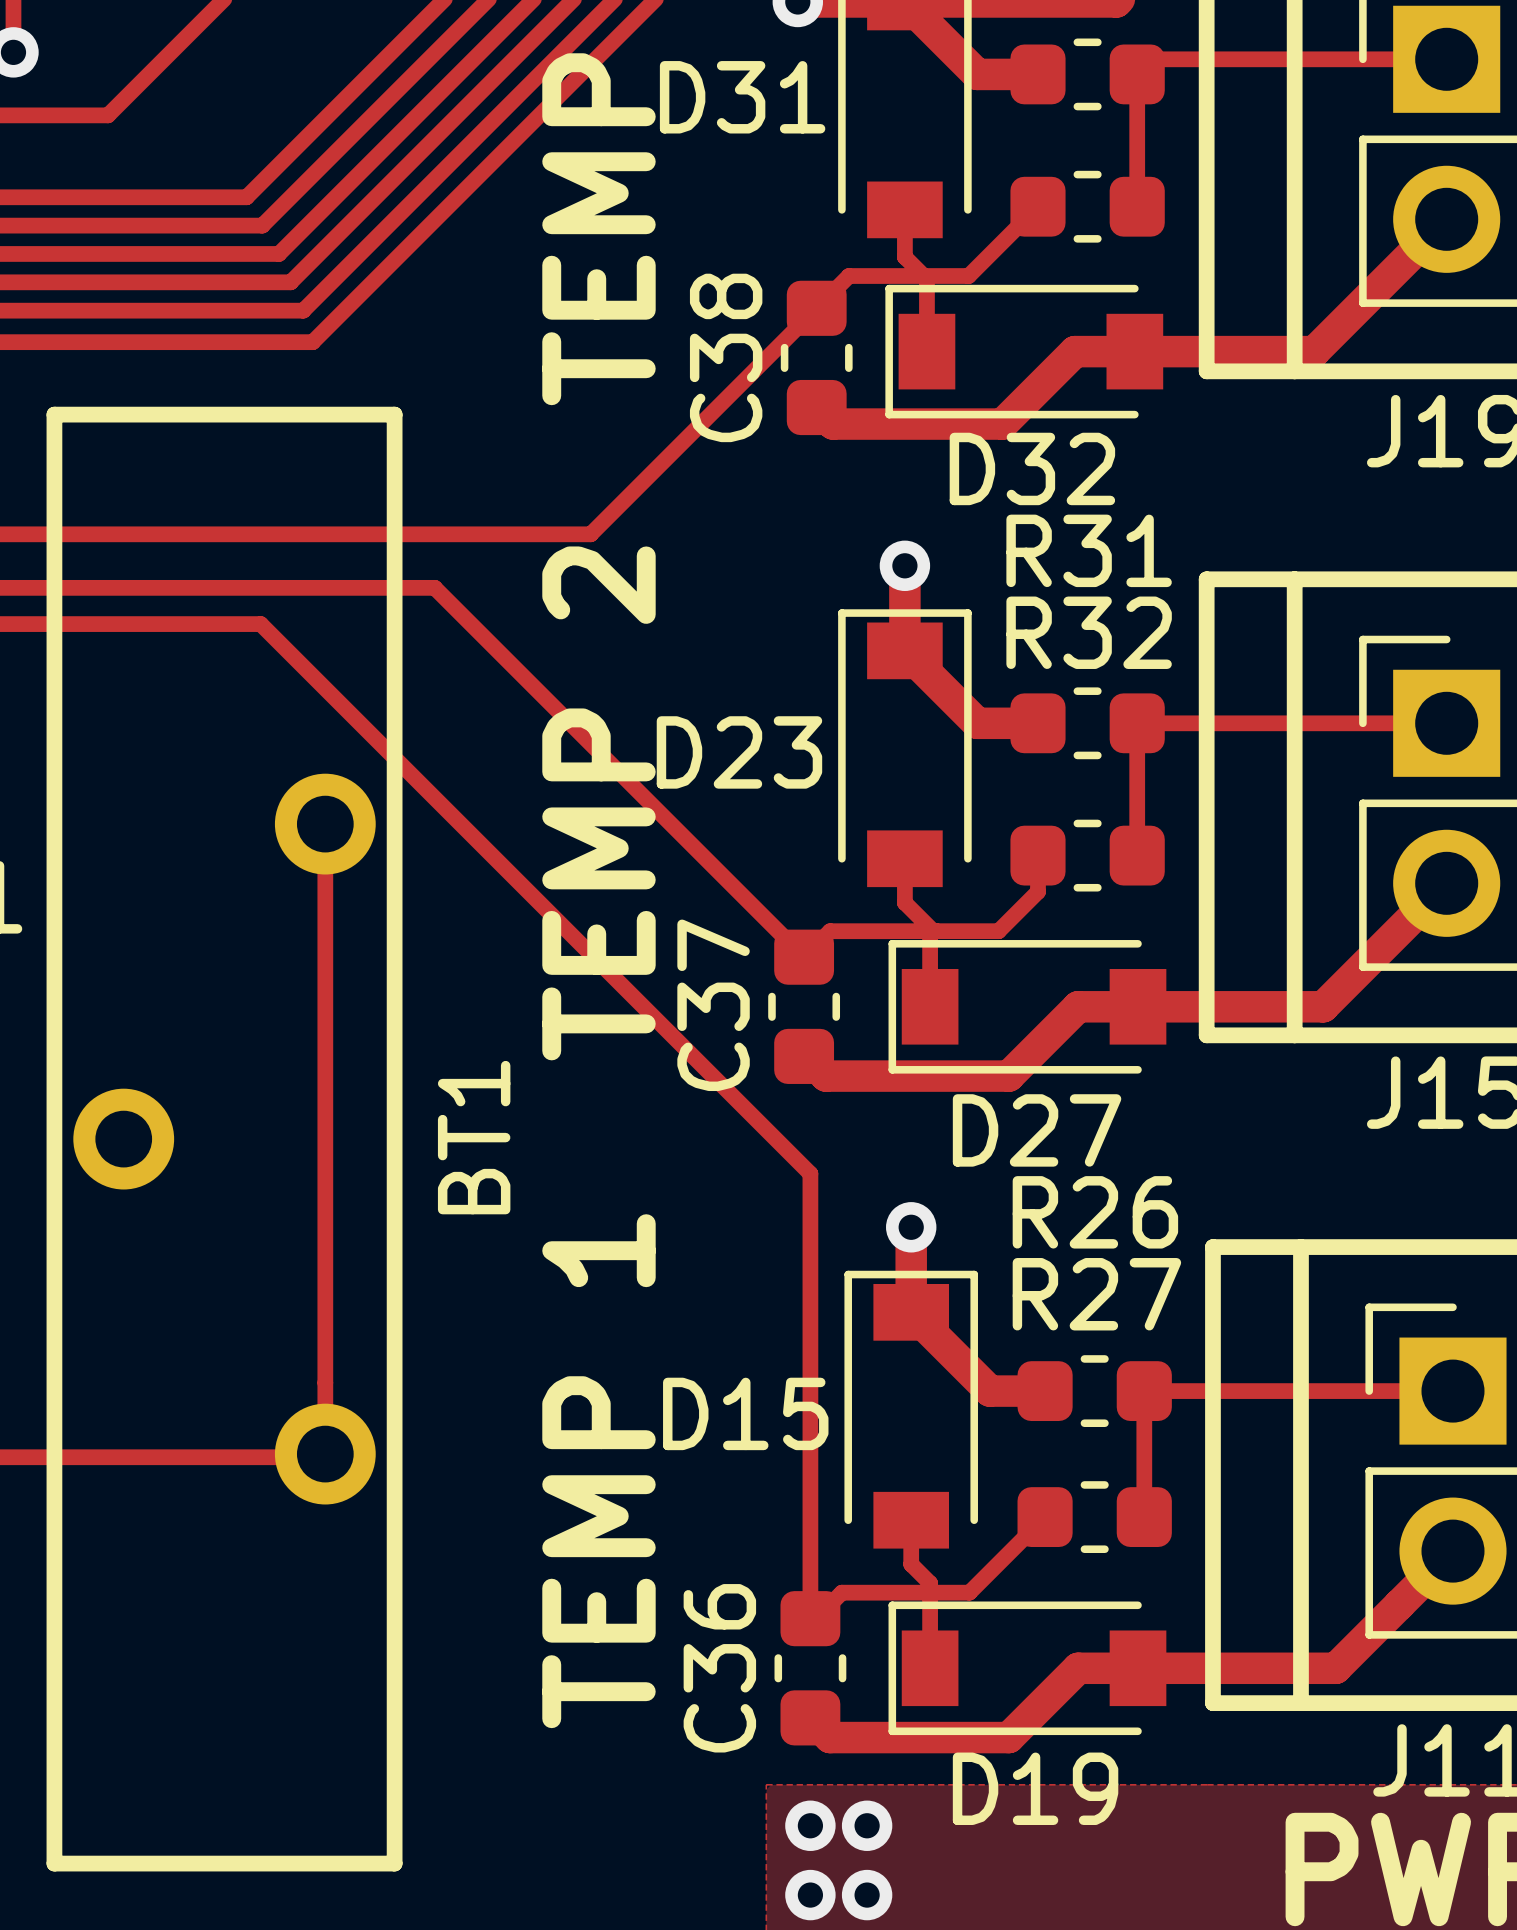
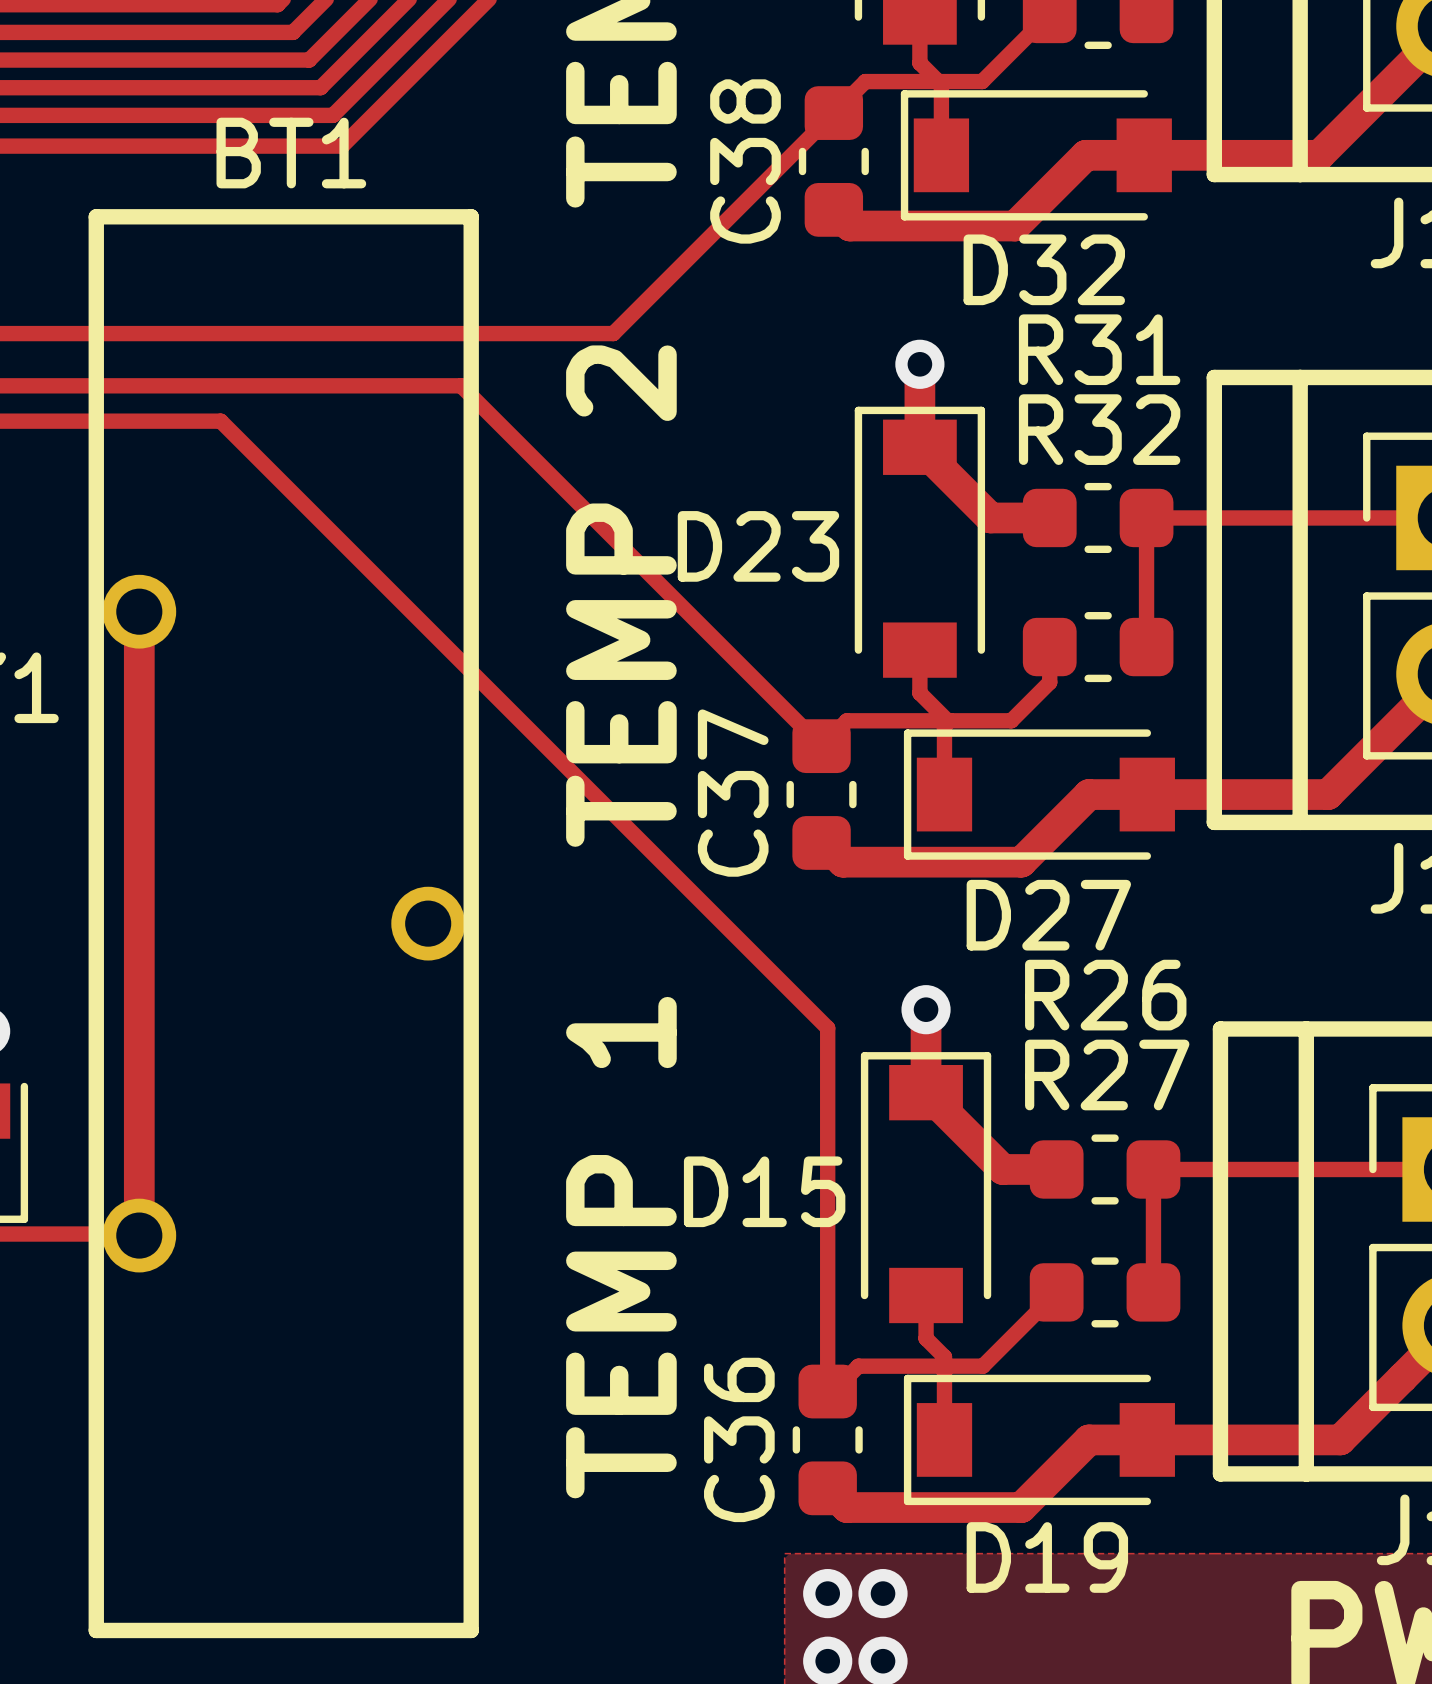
BT1 footprint: [46, 406, 403, 1872] -> [88, 209, 479, 1639]
track: (188, 624) (260, 624) (810, 1173) (810, 1246) -> (220, 421) (827, 1028)
track: (325, 824) (325, 1454) (322, 1457) (103, 1457) -> (139, 611) (139, 1235) (137, 1234)
BT1 name position: BT1 (474, 1137) -> BT1 (291, 153)

